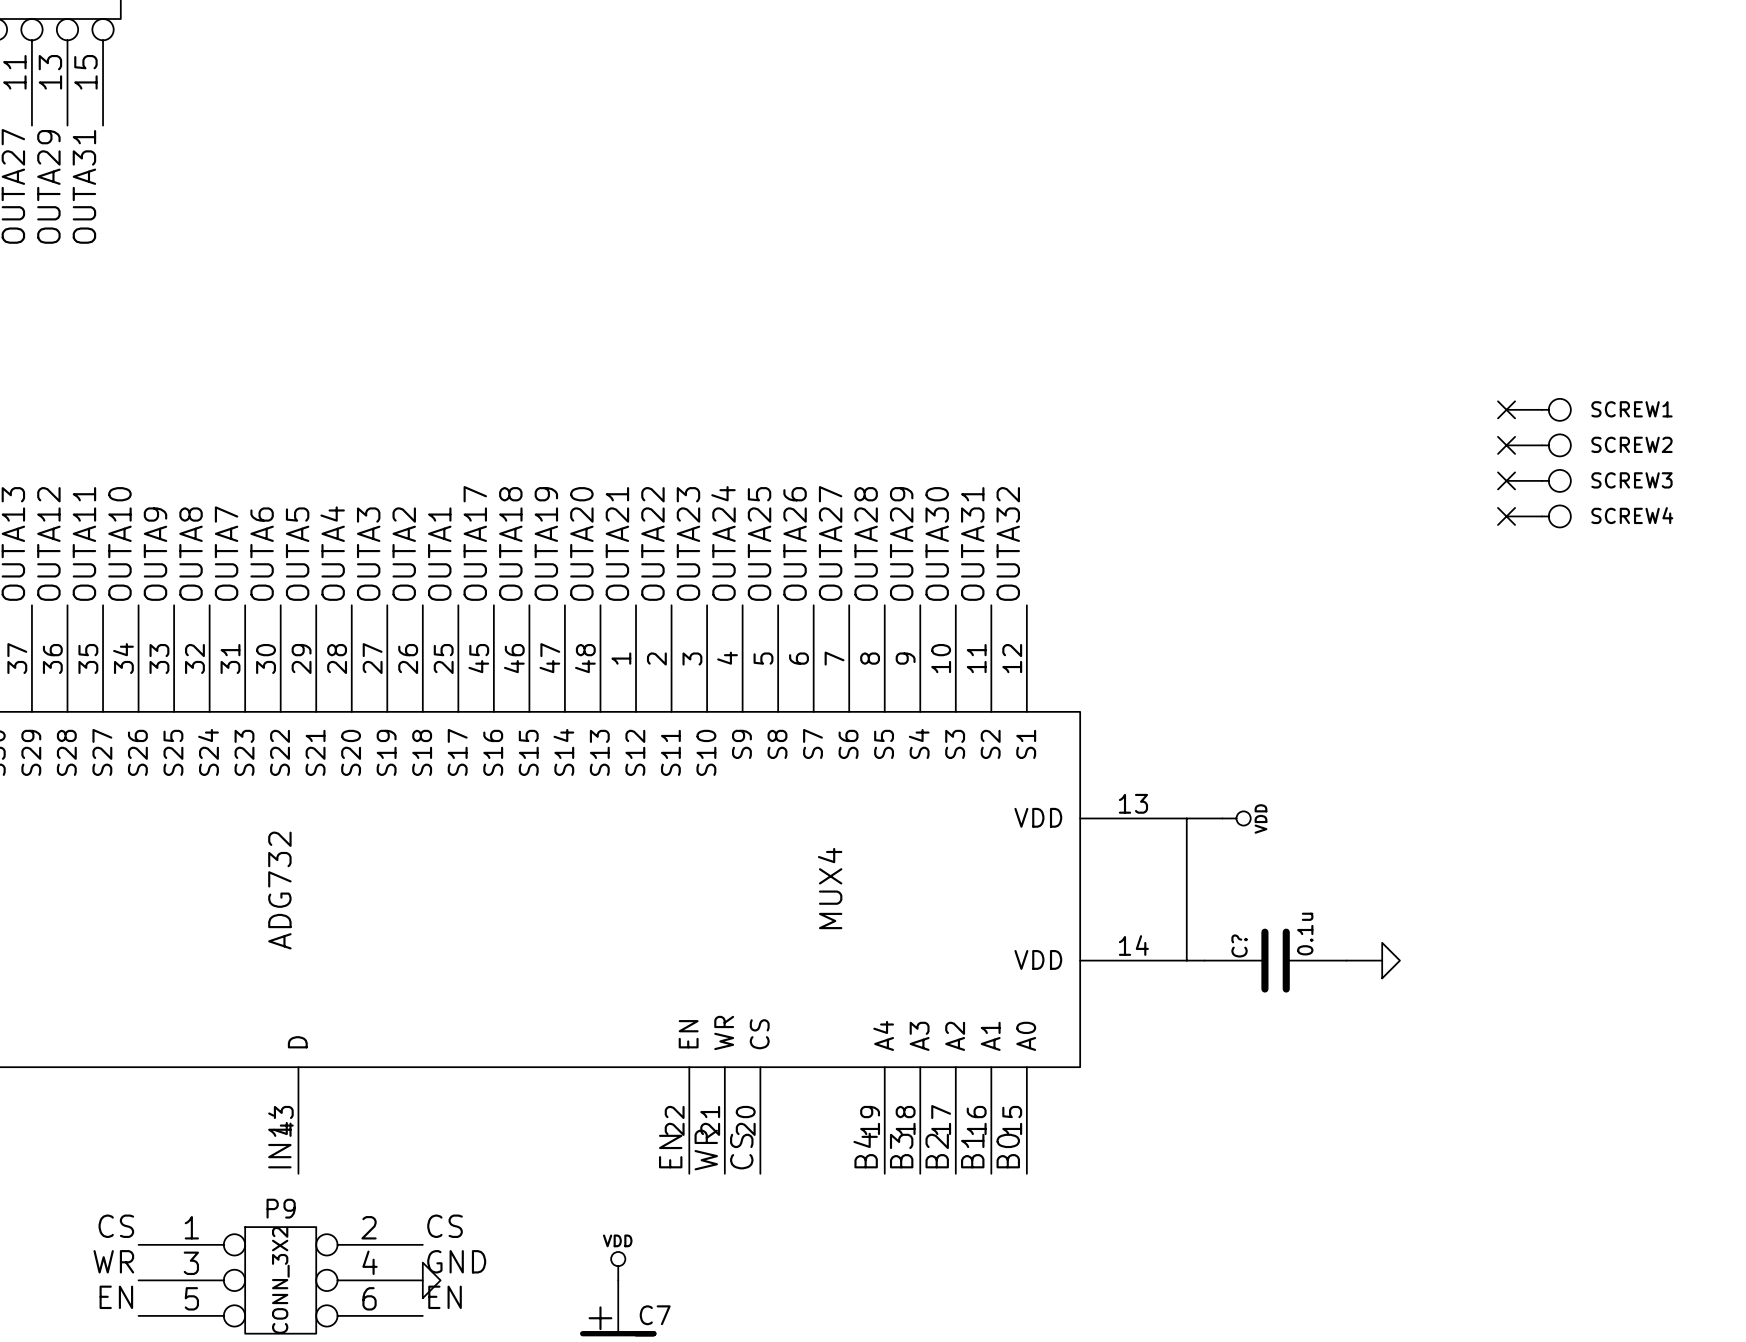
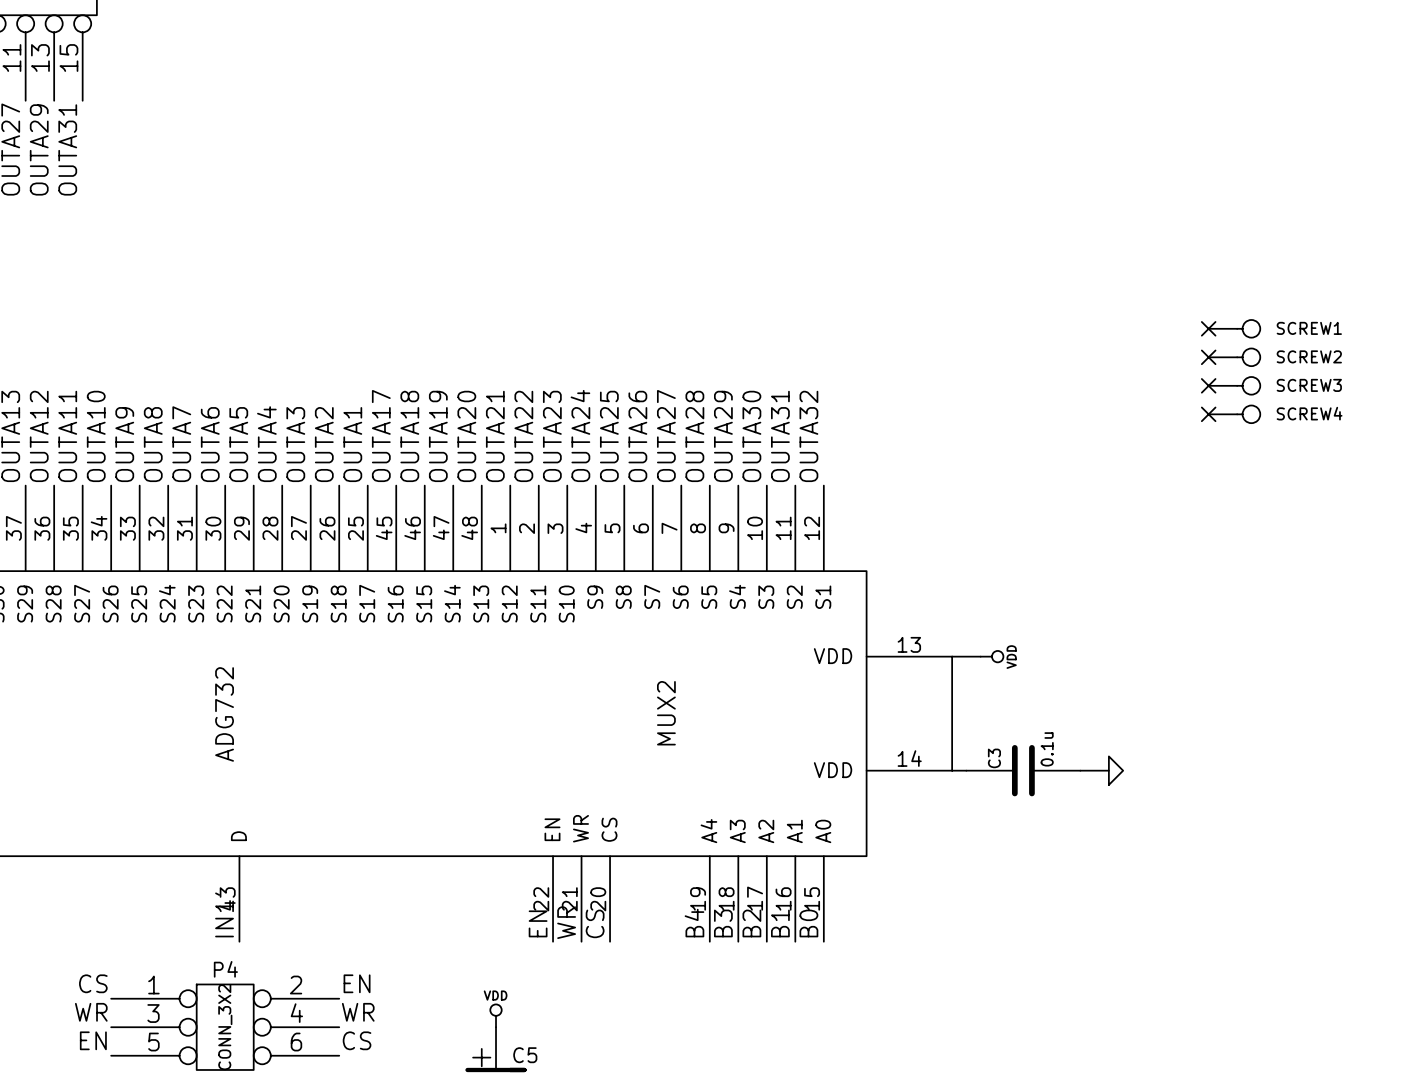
MUX4 name: MUX4 (830, 888) -> MUX2 (666, 713)
C? name: C? (1239, 945) -> C3 (994, 758)
P9 name: P9 (281, 1208) -> P4 (225, 969)
label: CS (445, 1226) -> EN (357, 983)
label: GND (456, 1261) -> WR (358, 1012)
power symbol: (431, 1280) -> none
label: EN (445, 1297) -> CS (357, 1040)
C7 name: C7 (655, 1315) -> C5 (525, 1055)

